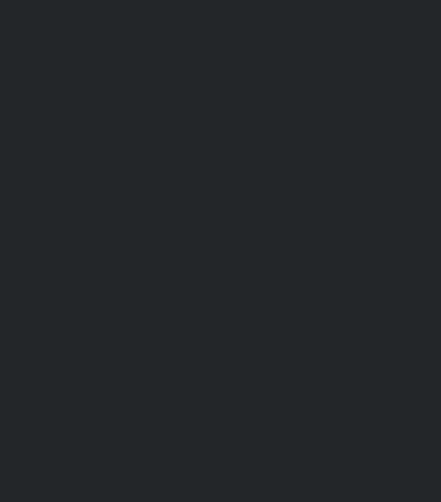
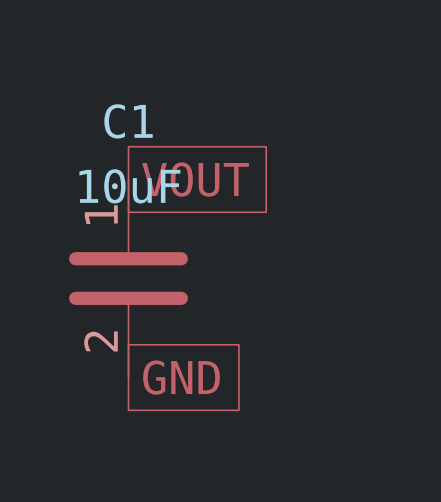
global label: none -> VOUT (195, 179)
C1: none -> 10uF (128, 278)
global label: none -> GND (181, 377)

